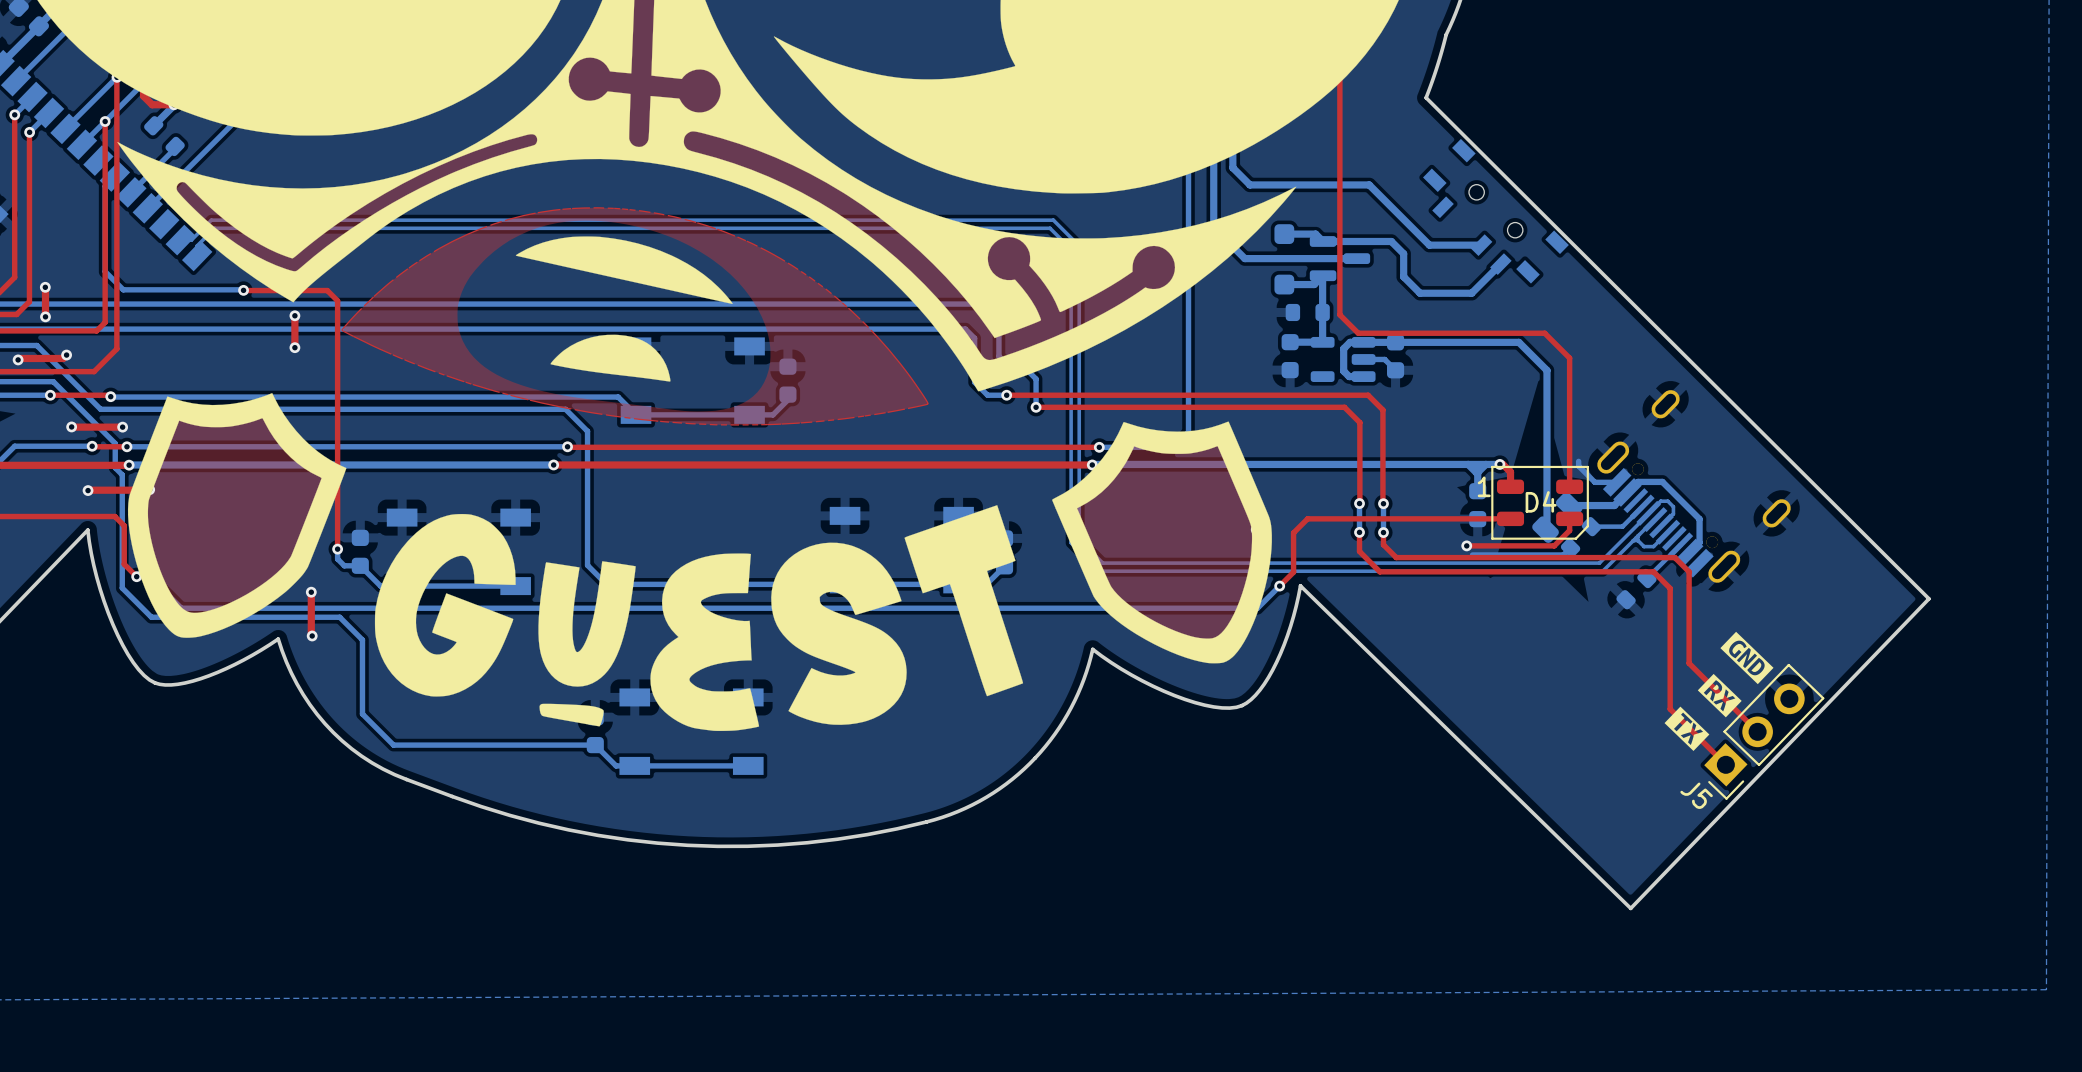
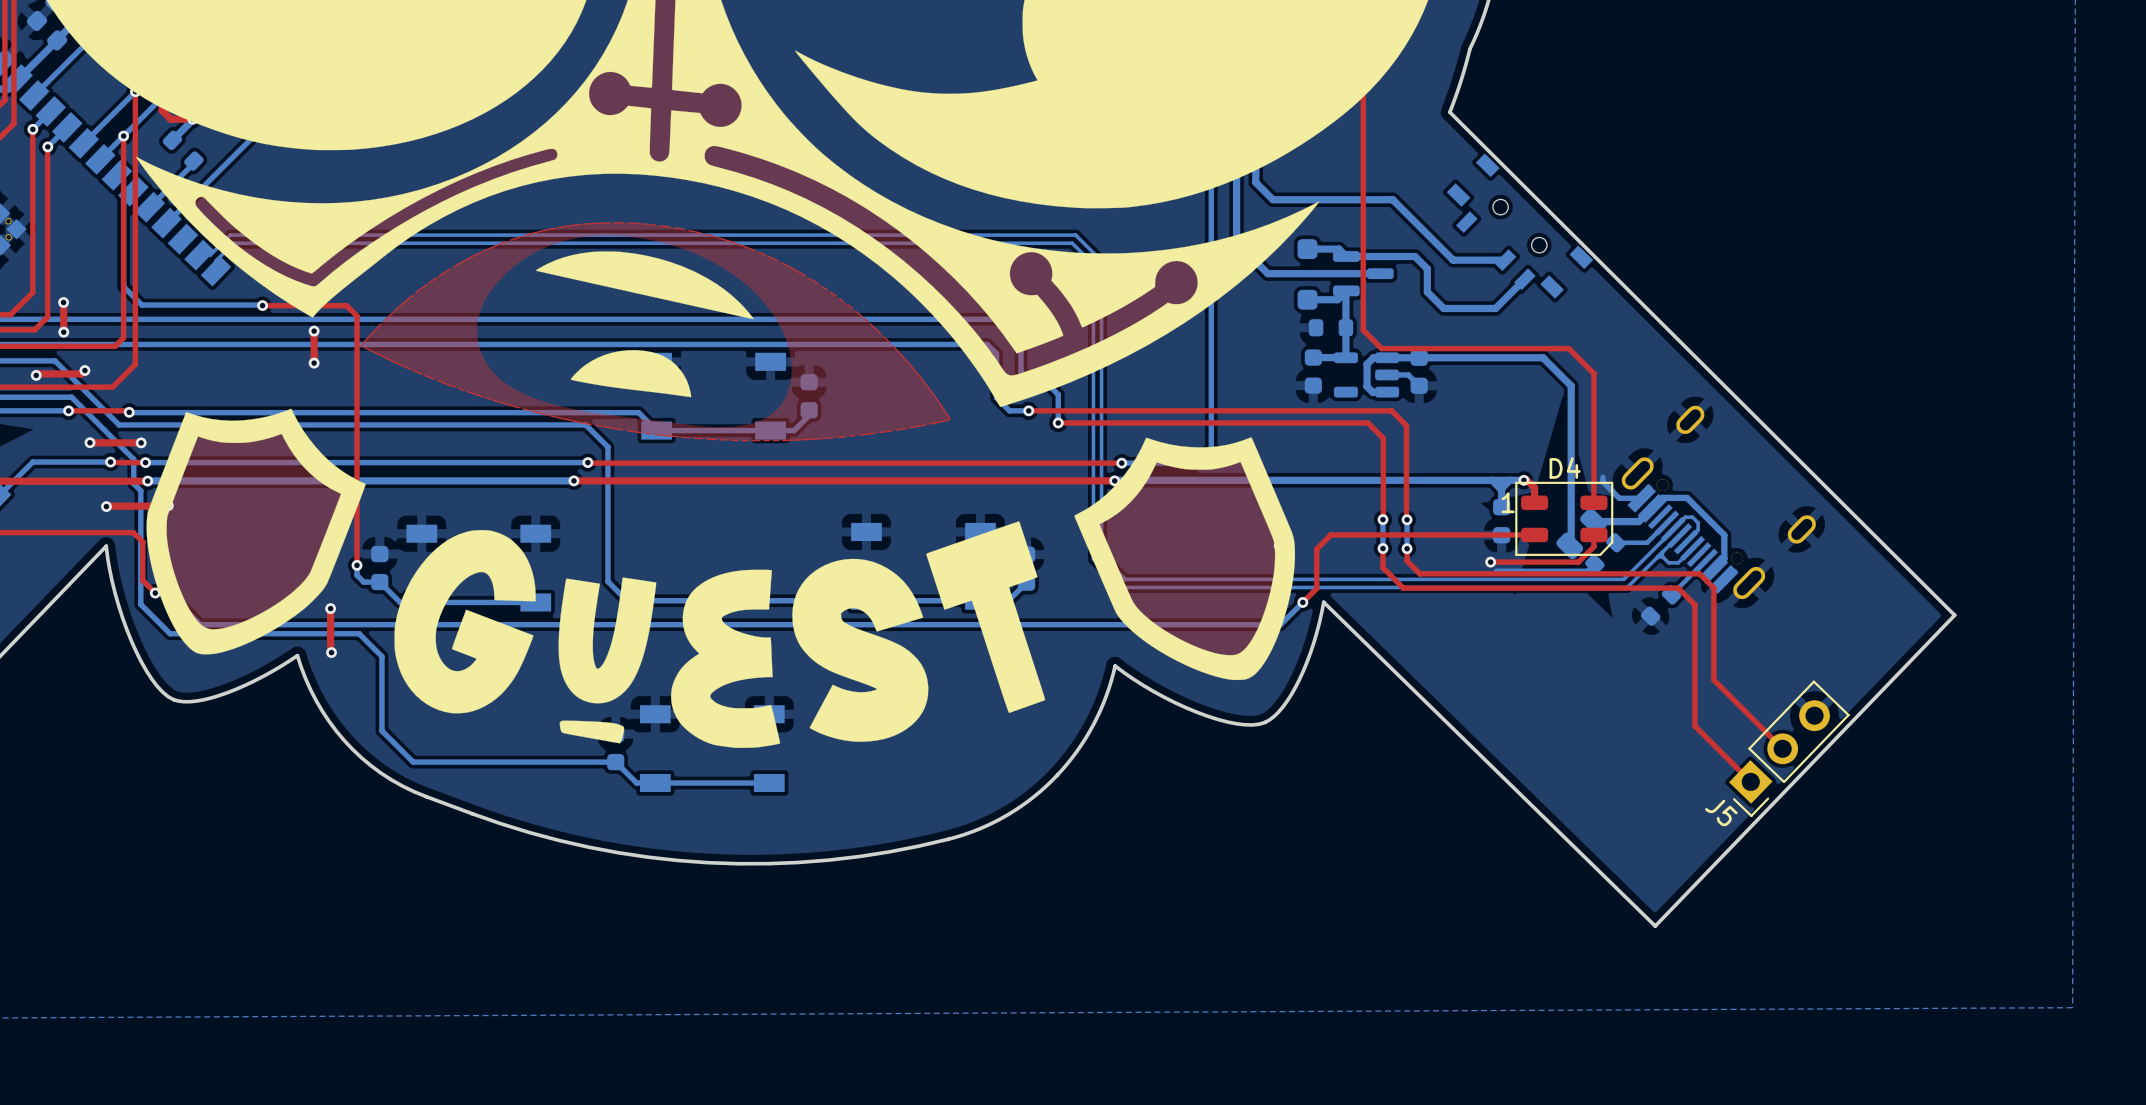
D4 name position: D4 (1541, 501) -> D4 (1565, 468)
drawing: [1664, 631, 1774, 751] -> none

